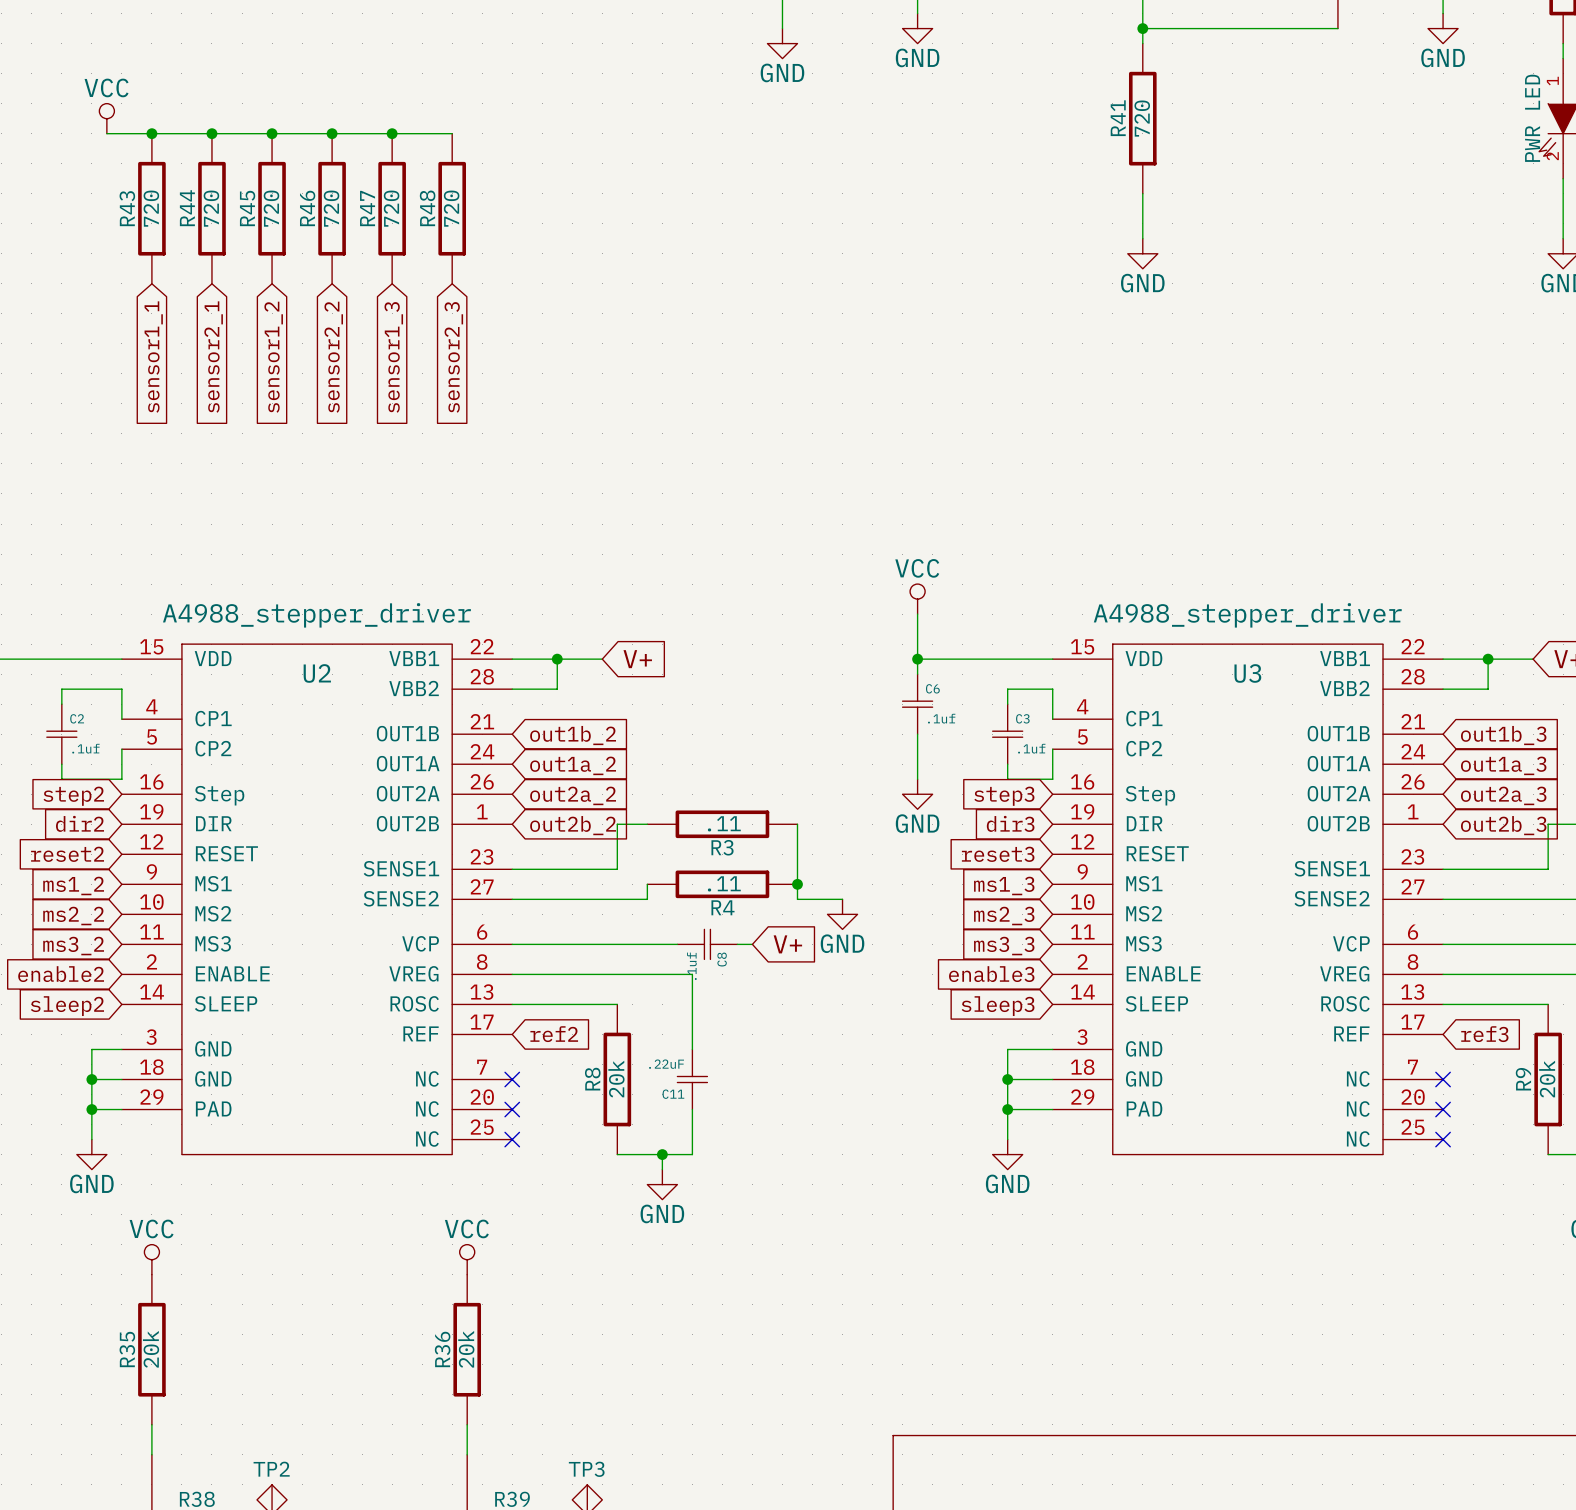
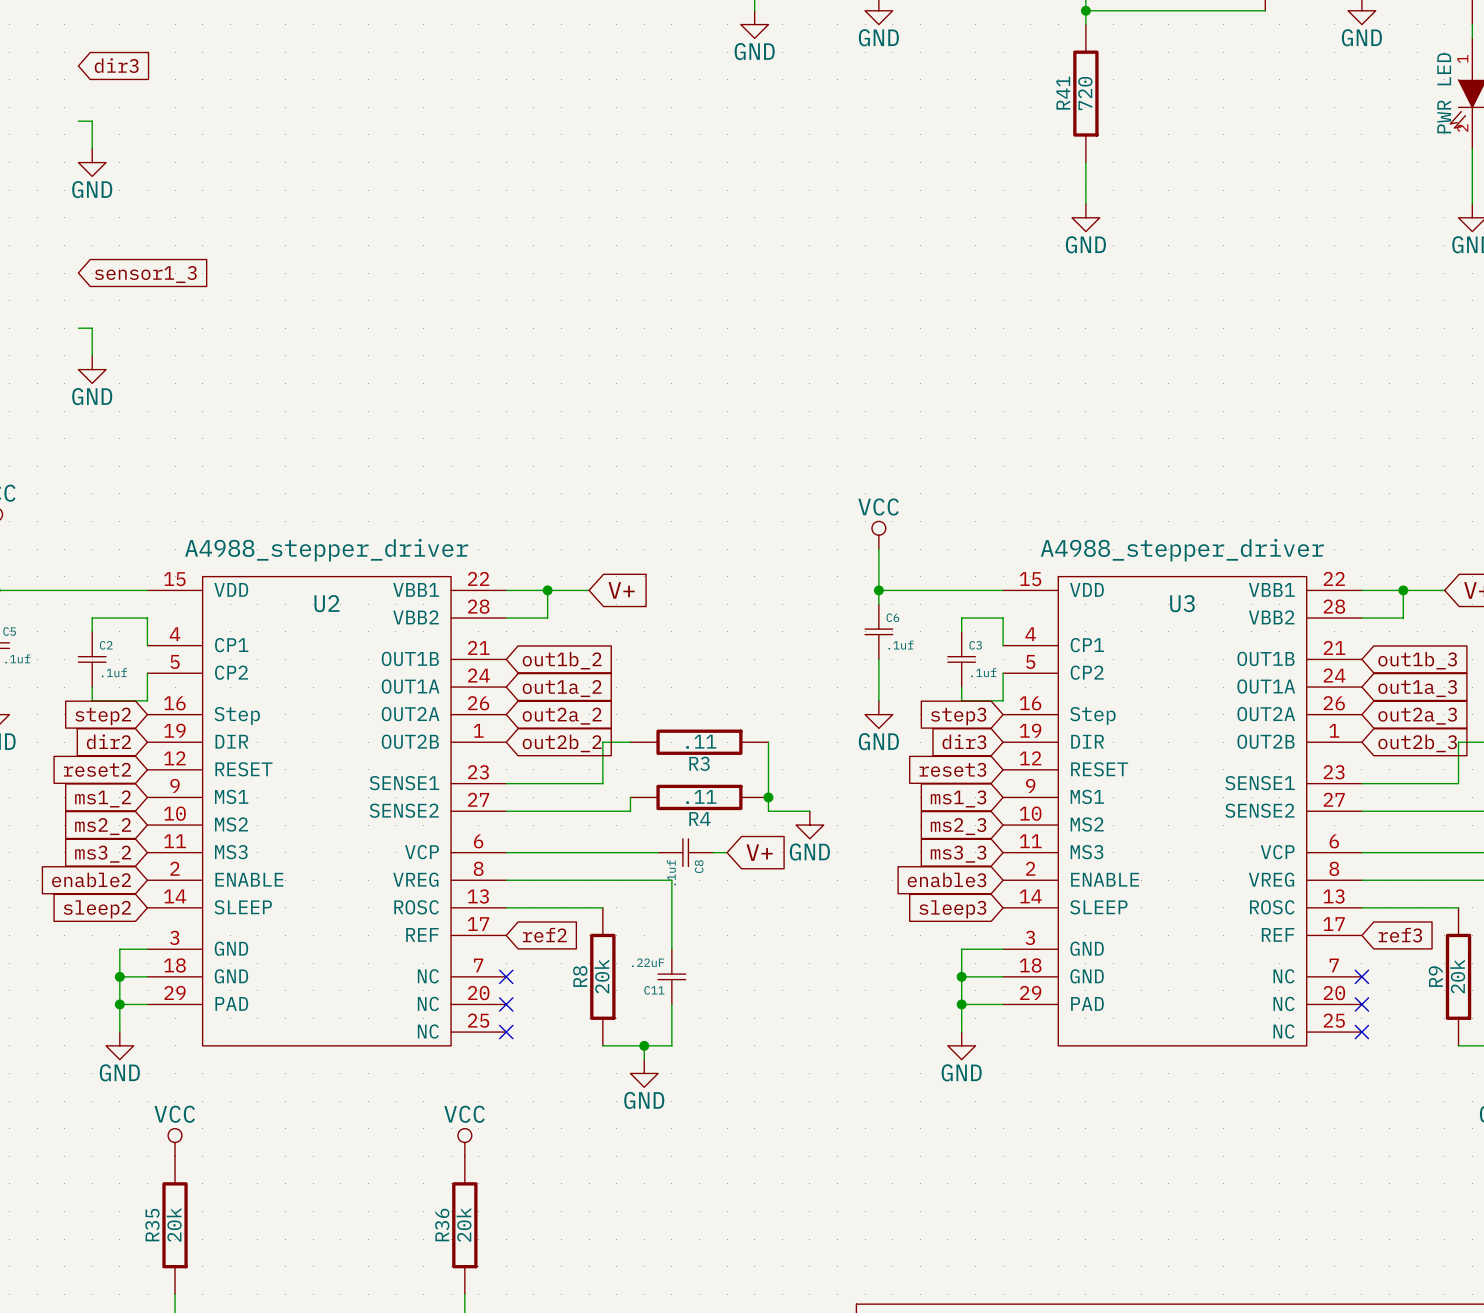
global label: none -> dir3 (116, 65)
power symbol: VCC (106, 118) -> none
wire: (106, 133) (452, 133) -> none
junction: (151, 133) -> none
junction: (211, 133) -> none
junction: (272, 133) -> none
junction: (332, 133) -> none
junction: (392, 133) -> none
wire: none -> (78, 121) (92, 121) (92, 148)
power symbol: none -> GND (92, 162)
R43: 720 (151, 208) -> none
R44: 720 (211, 208) -> none
R45: 720 (272, 208) -> none
R46: 720 (332, 208) -> none
R47: 720 (392, 208) -> none
R48: 720 (452, 208) -> none
global label: none -> sensor1_3 (145, 274)
global label: sensor1_1 (153, 357) -> none
global label: sensor2_1 (213, 357) -> none
global label: sensor1_2 (273, 357) -> none
global label: sensor2_2 (333, 357) -> none
global label: sensor1_3 (393, 357) -> none
global label: sensor2_3 (453, 357) -> none
wire: none -> (78, 328) (92, 328) (92, 355)
power symbol: none -> GND (92, 369)

